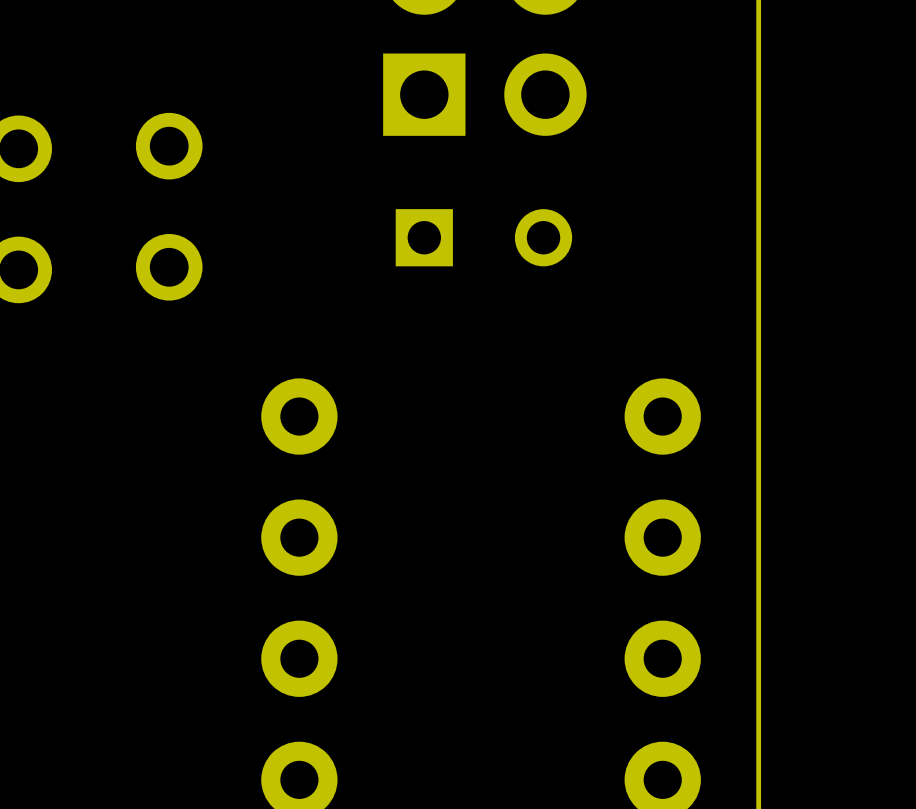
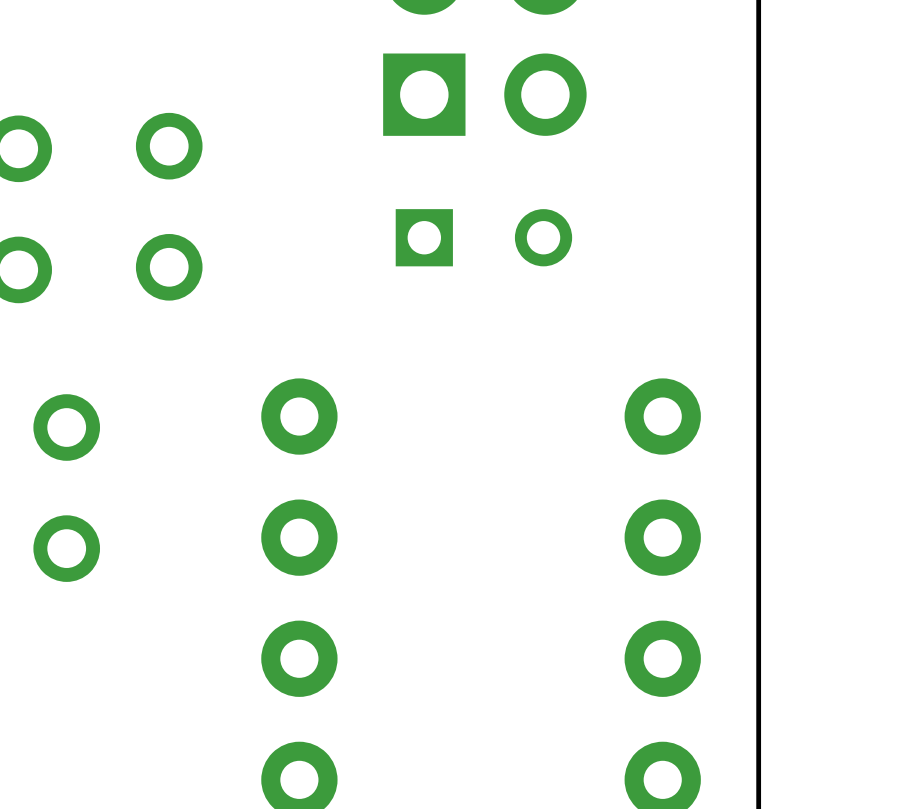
part: none -> (66, 488)

